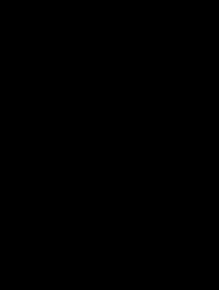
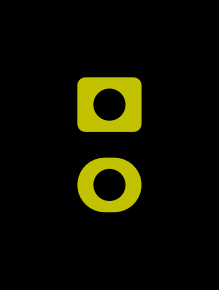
part: none -> (109, 144)

